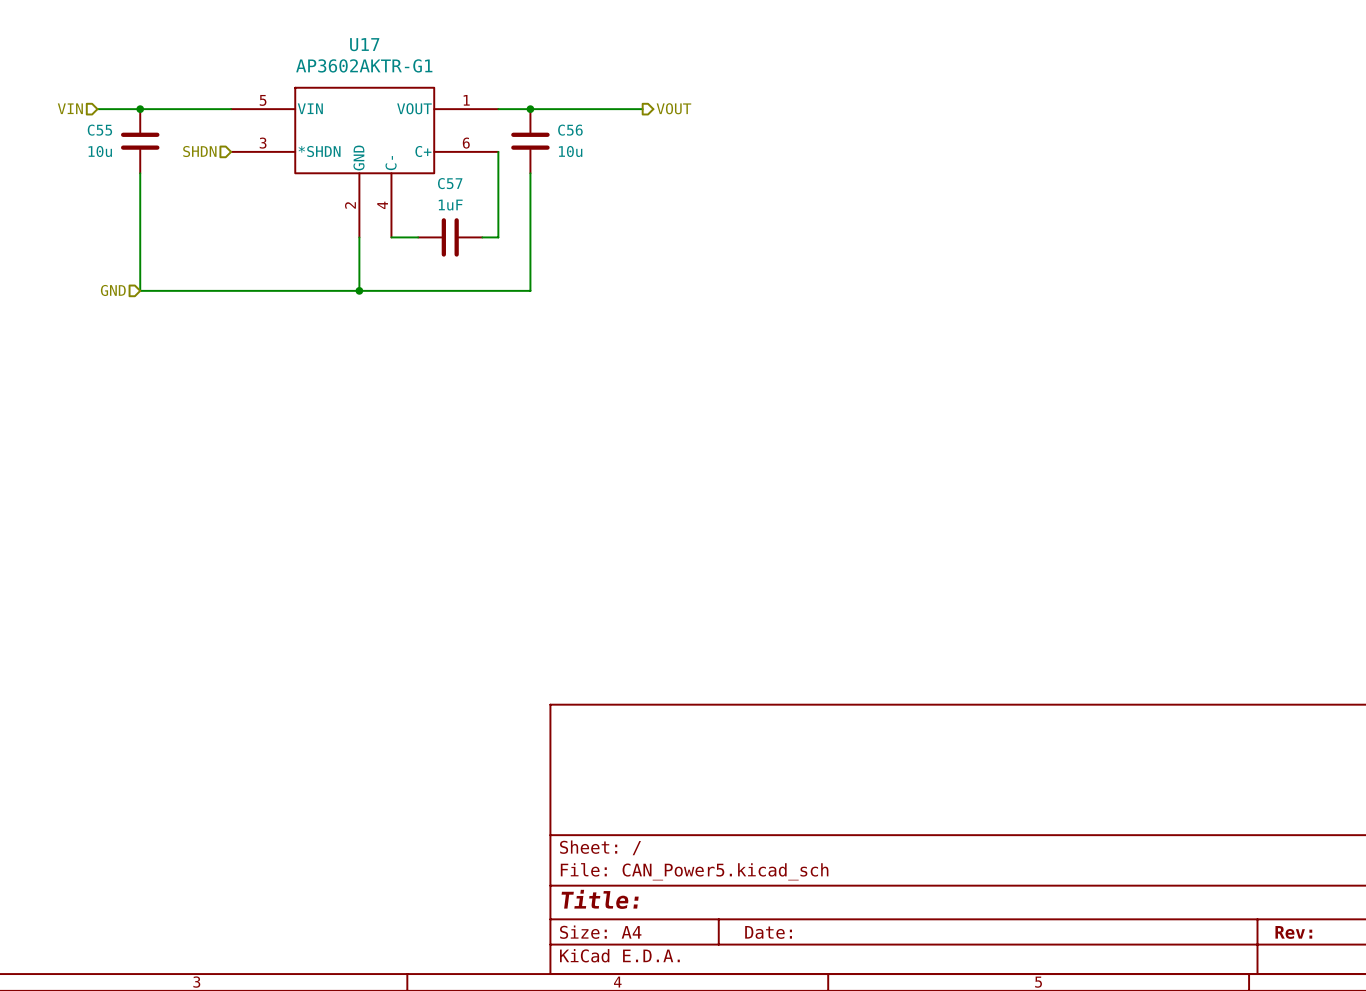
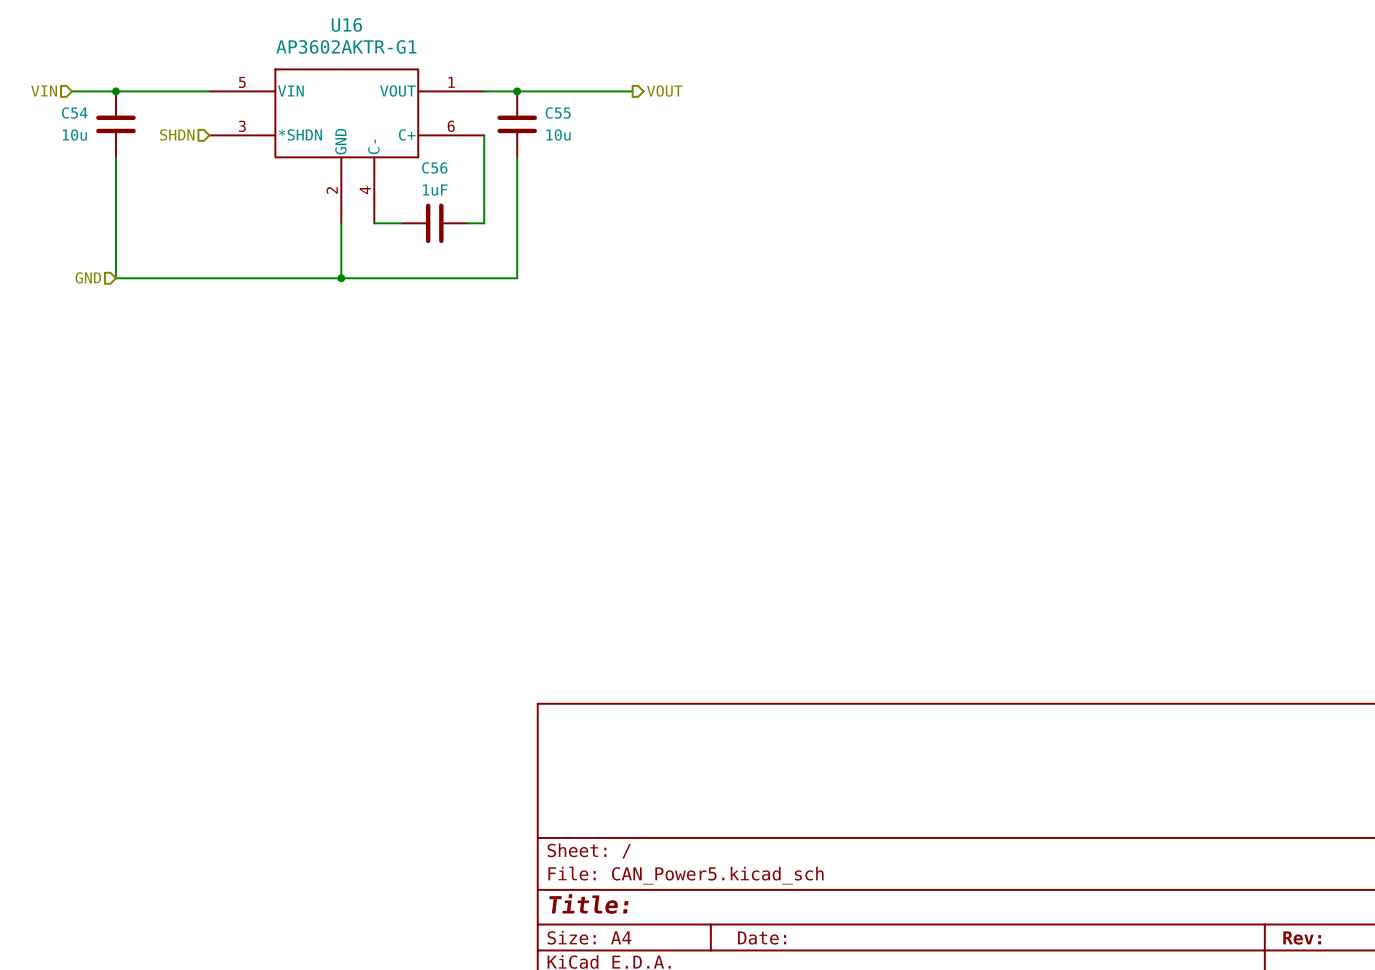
U17 name: U17 (364, 44) -> U16 (346, 24)
C55 name: C55 (99, 130) -> C54 (74, 112)
C56 name: C56 (570, 130) -> C55 (558, 112)
C57 name: C57 (450, 183) -> C56 (434, 167)

